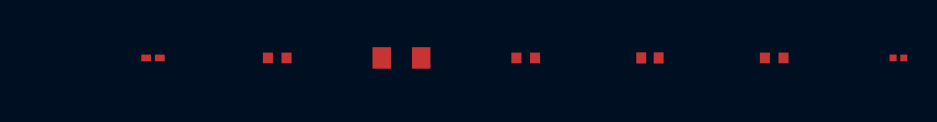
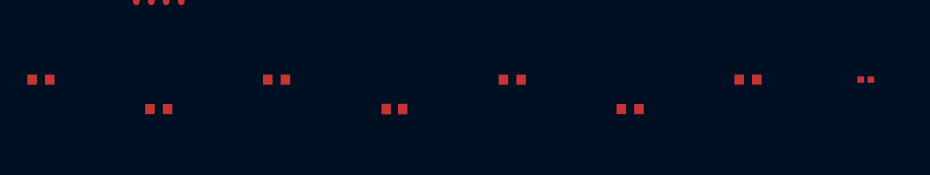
part: none -> (40, 79)
part: (152, 57) -> none
part: (401, 57) -> none
part position: (649, 57) -> (394, 109)
part: none -> (158, 109)
part: none -> (630, 109)

